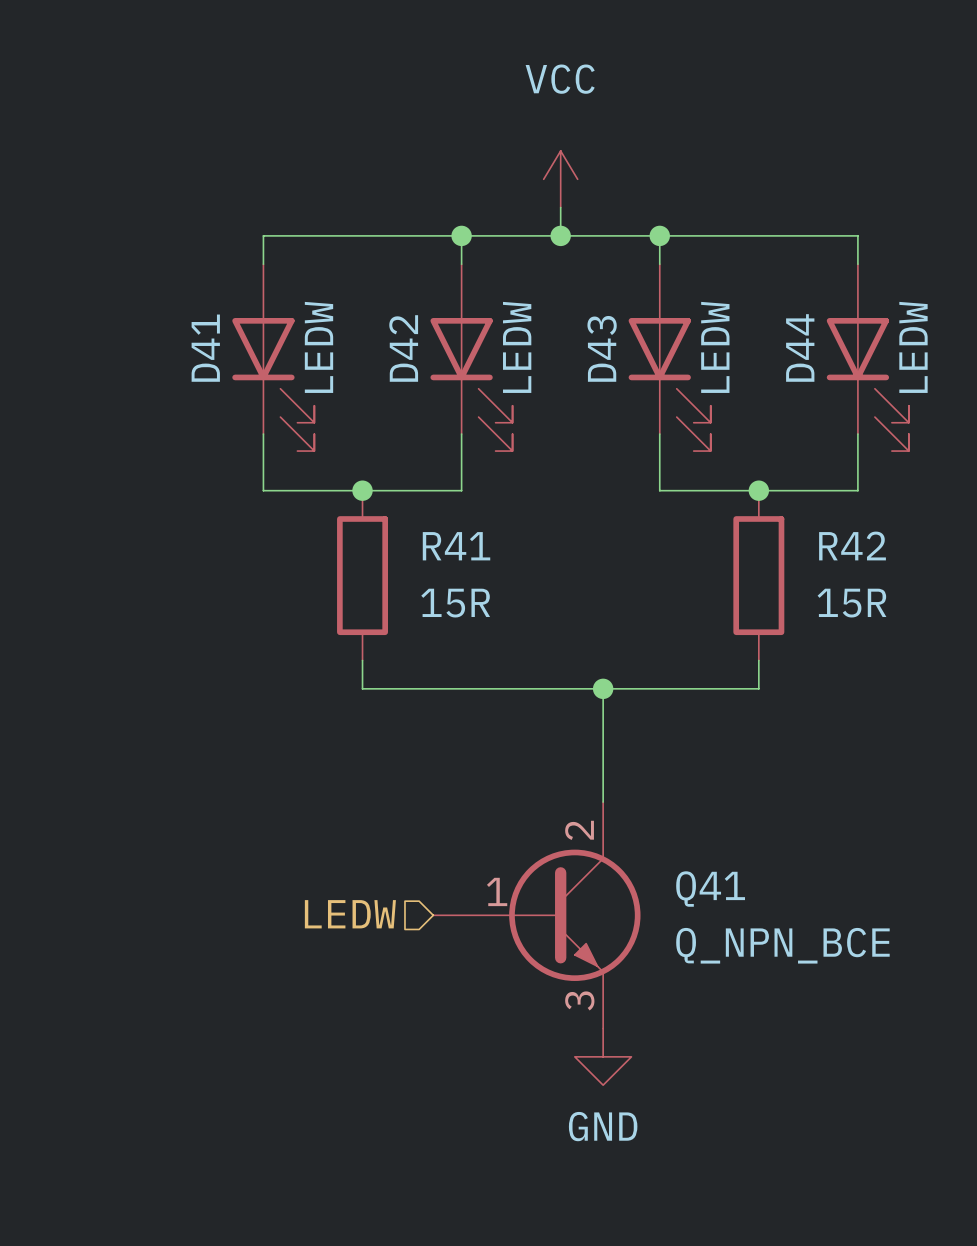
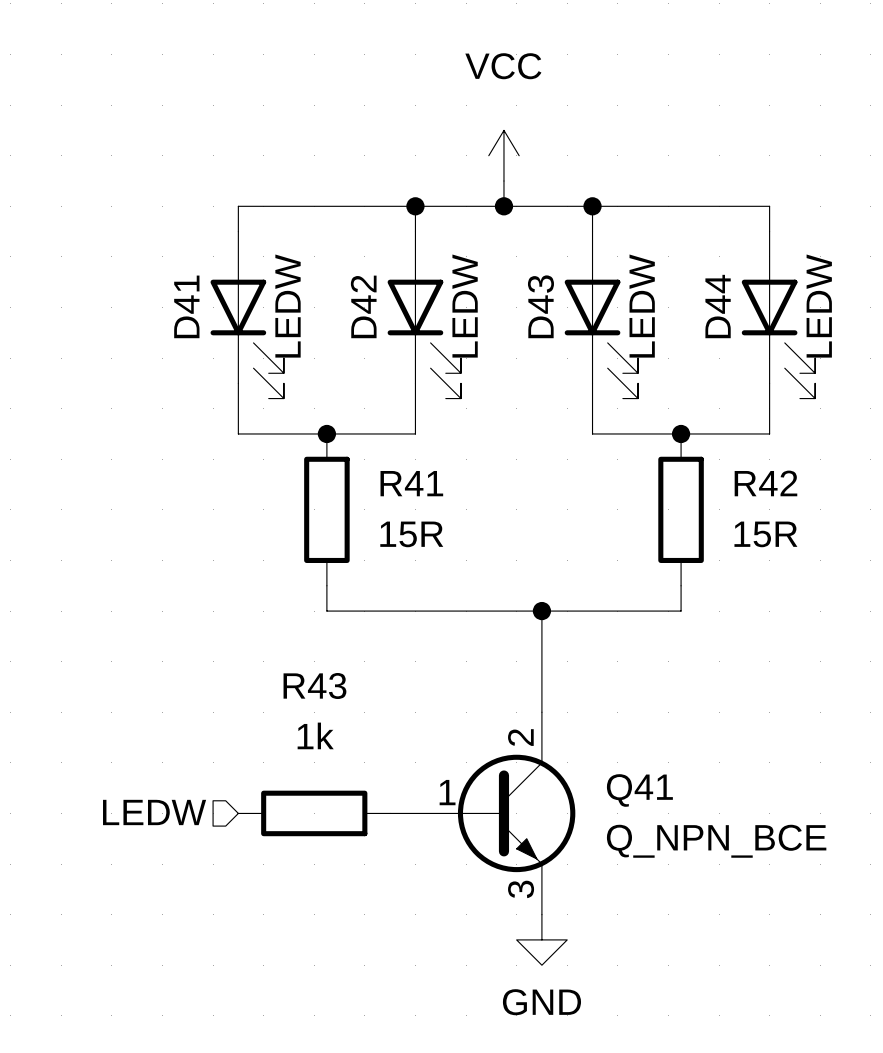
hierarchical label position: LEDW (350, 914) -> LEDW (154, 812)
R43: none -> 1k (314, 813)

